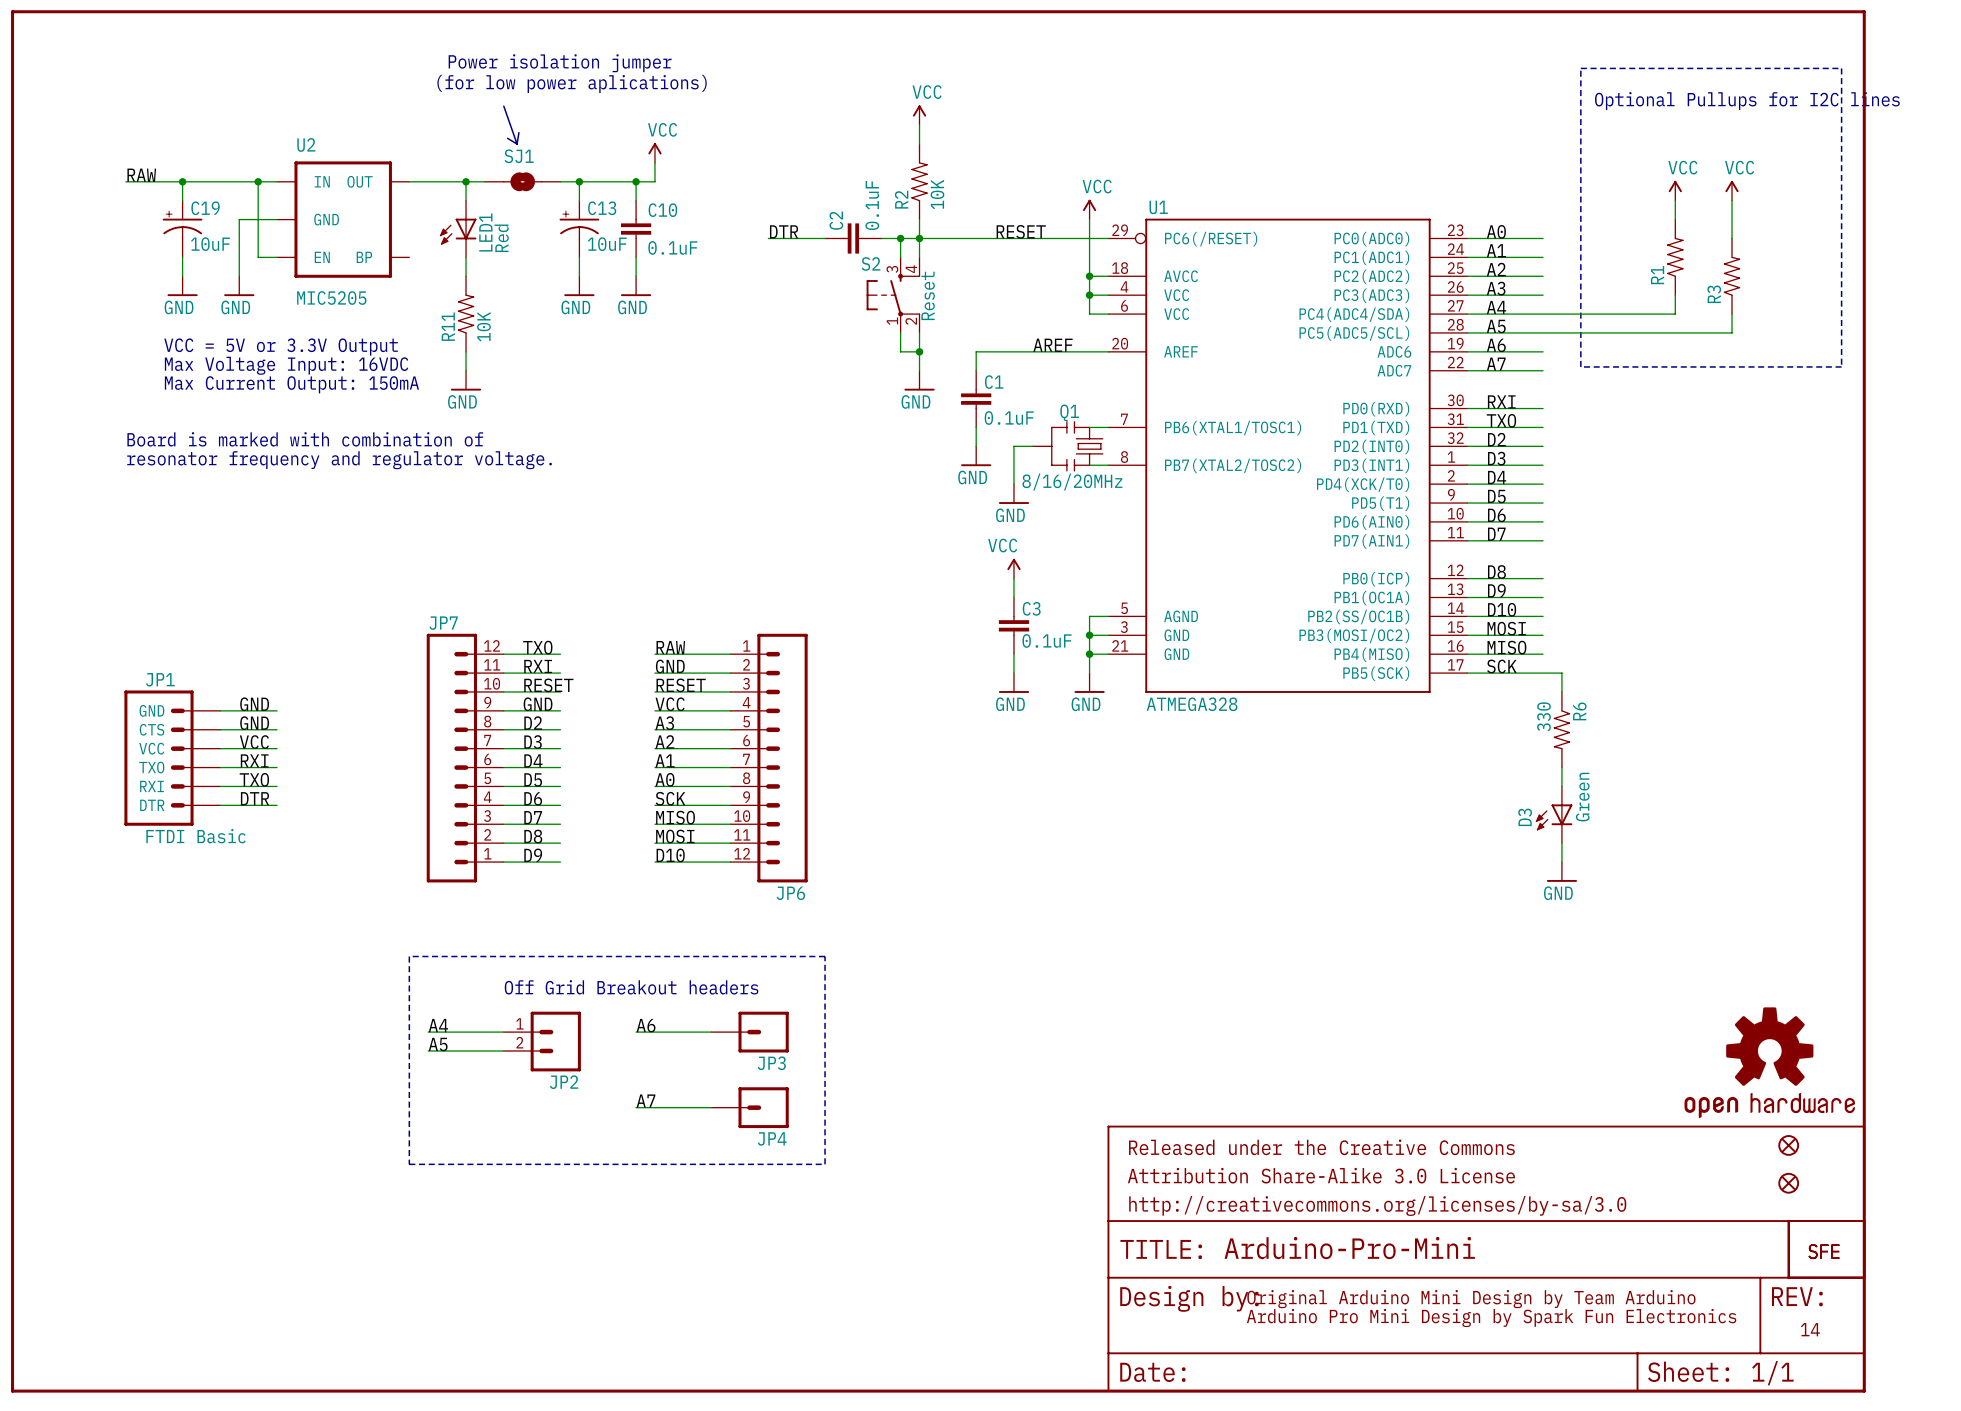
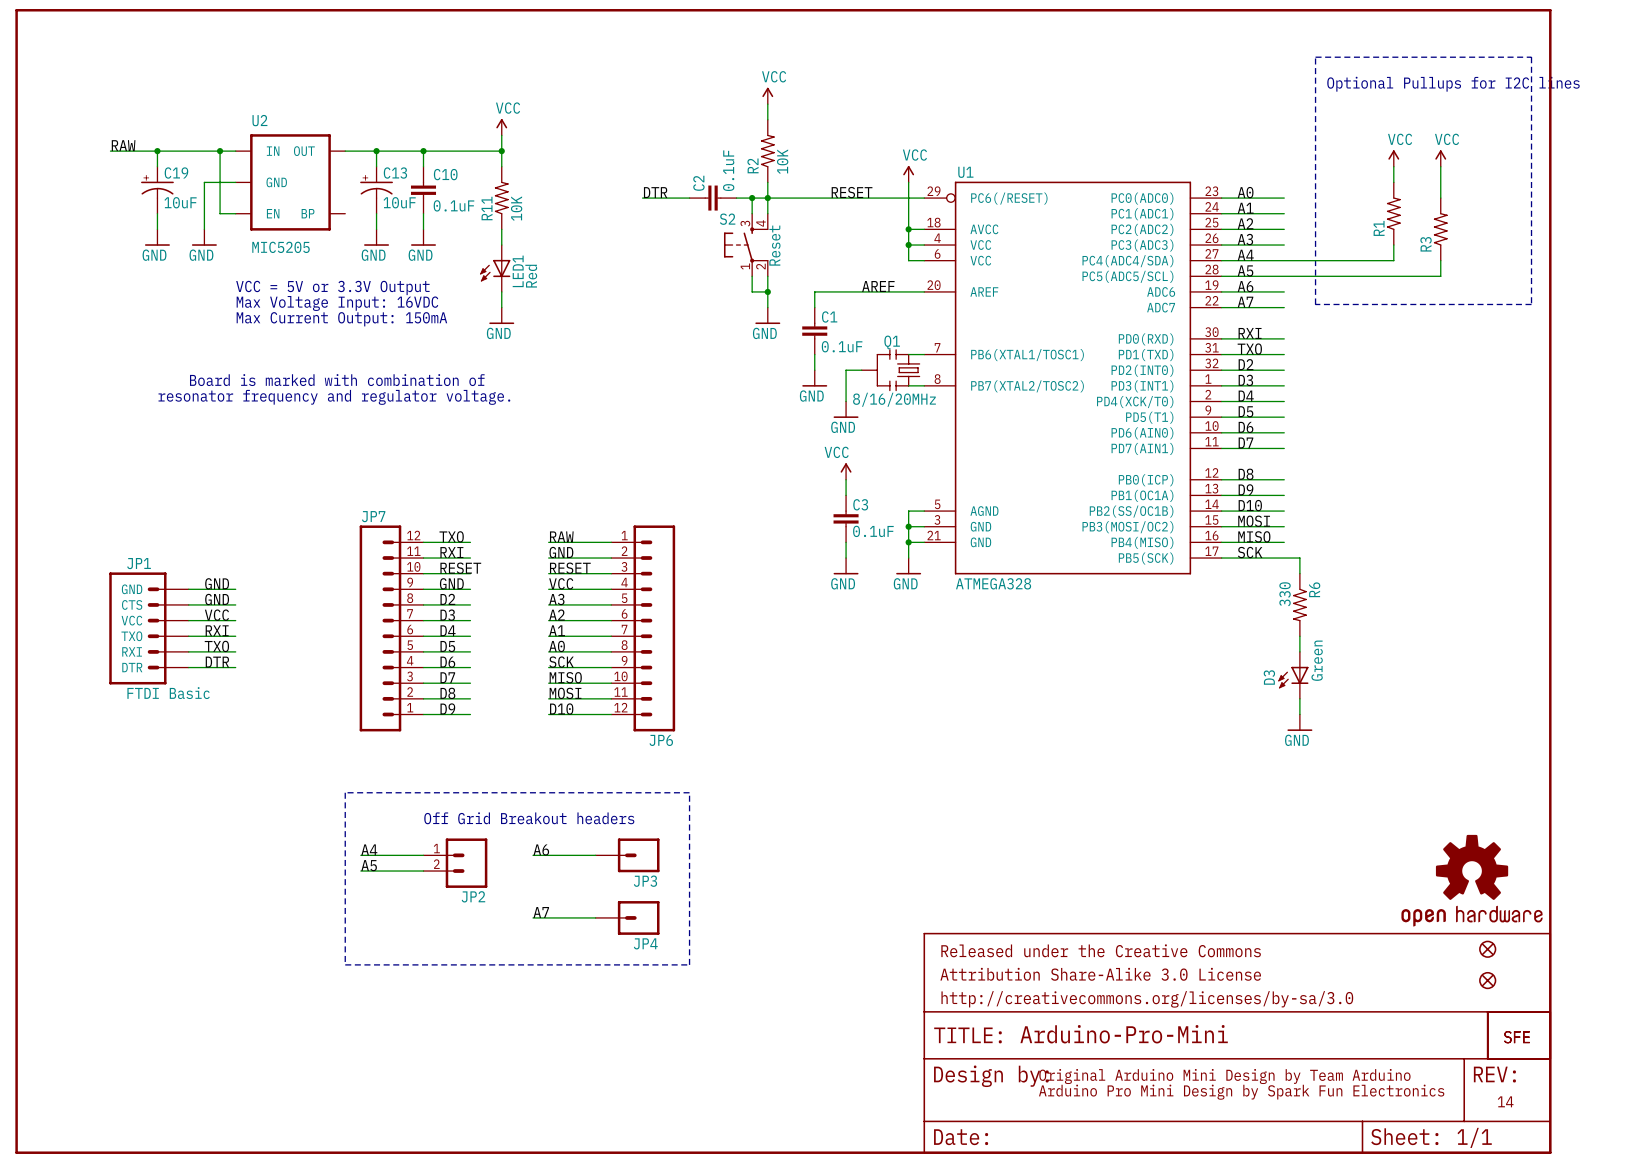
text: Power isolation jumper (560, 63) -> none
text: (for low power aplications) (572, 83) -> none
line: (503, 106) (517, 144) -> none
line: (518, 132) (517, 144) -> none
line: (507, 138) (517, 144) -> none
power symbol position: VCC (654, 152) -> VCC (501, 127)
wire: none -> (501, 135) (501, 166)
wire: (654, 162) (654, 181) (598, 181) -> none
junction: none -> (376, 151)
wire: (466, 181) (466, 200) -> (501, 229) (501, 245)
junction: (466, 181) -> none
junction: none -> (423, 151)
SJ1: (522, 181) -> none
wire: (579, 181) (579, 200) -> (376, 151) (376, 166)
junction: (579, 181) -> none
junction: none -> (501, 151)
wire: (636, 181) (636, 200) -> (423, 151) (423, 166)
junction: (636, 181) -> none
LED1 position: (458, 229) -> (495, 268)
C13 position: (579, 229) -> (376, 190)
C10 position: (636, 229) -> (423, 190)
wire: (466, 257) (466, 276) -> (501, 291) (501, 307)
wire: (579, 257) (579, 276) -> (376, 213) (376, 229)
wire: (636, 257) (636, 276) -> (423, 213) (423, 229)
power symbol: none -> GND (376, 237)
power symbol: none -> GND (423, 237)
power symbol: GND (579, 286) -> none
power symbol: GND (636, 286) -> none
R11 position: (466, 314) -> (501, 198)
text position: VCC = 5V or 3.3V Output (281, 347) -> VCC = 5V or 3.3V Output (332, 287)
wire: (466, 351) (466, 370) -> none
text position: Max Voltage Input: 16VDC (286, 365) -> Max Voltage Input: 16VDC (337, 303)
power symbol: GND (466, 380) -> none
power symbol: none -> GND (501, 315)
text position: Max Current Output: 150mA (291, 384) -> Max Current Output: 150mA (341, 319)
text position: Board is marked with combination of (305, 439) -> Board is marked with combination of (337, 380)
text position: resonator frequency and regulator voltage. (339, 460) -> resonator frequency and regulator voltage. (334, 397)

